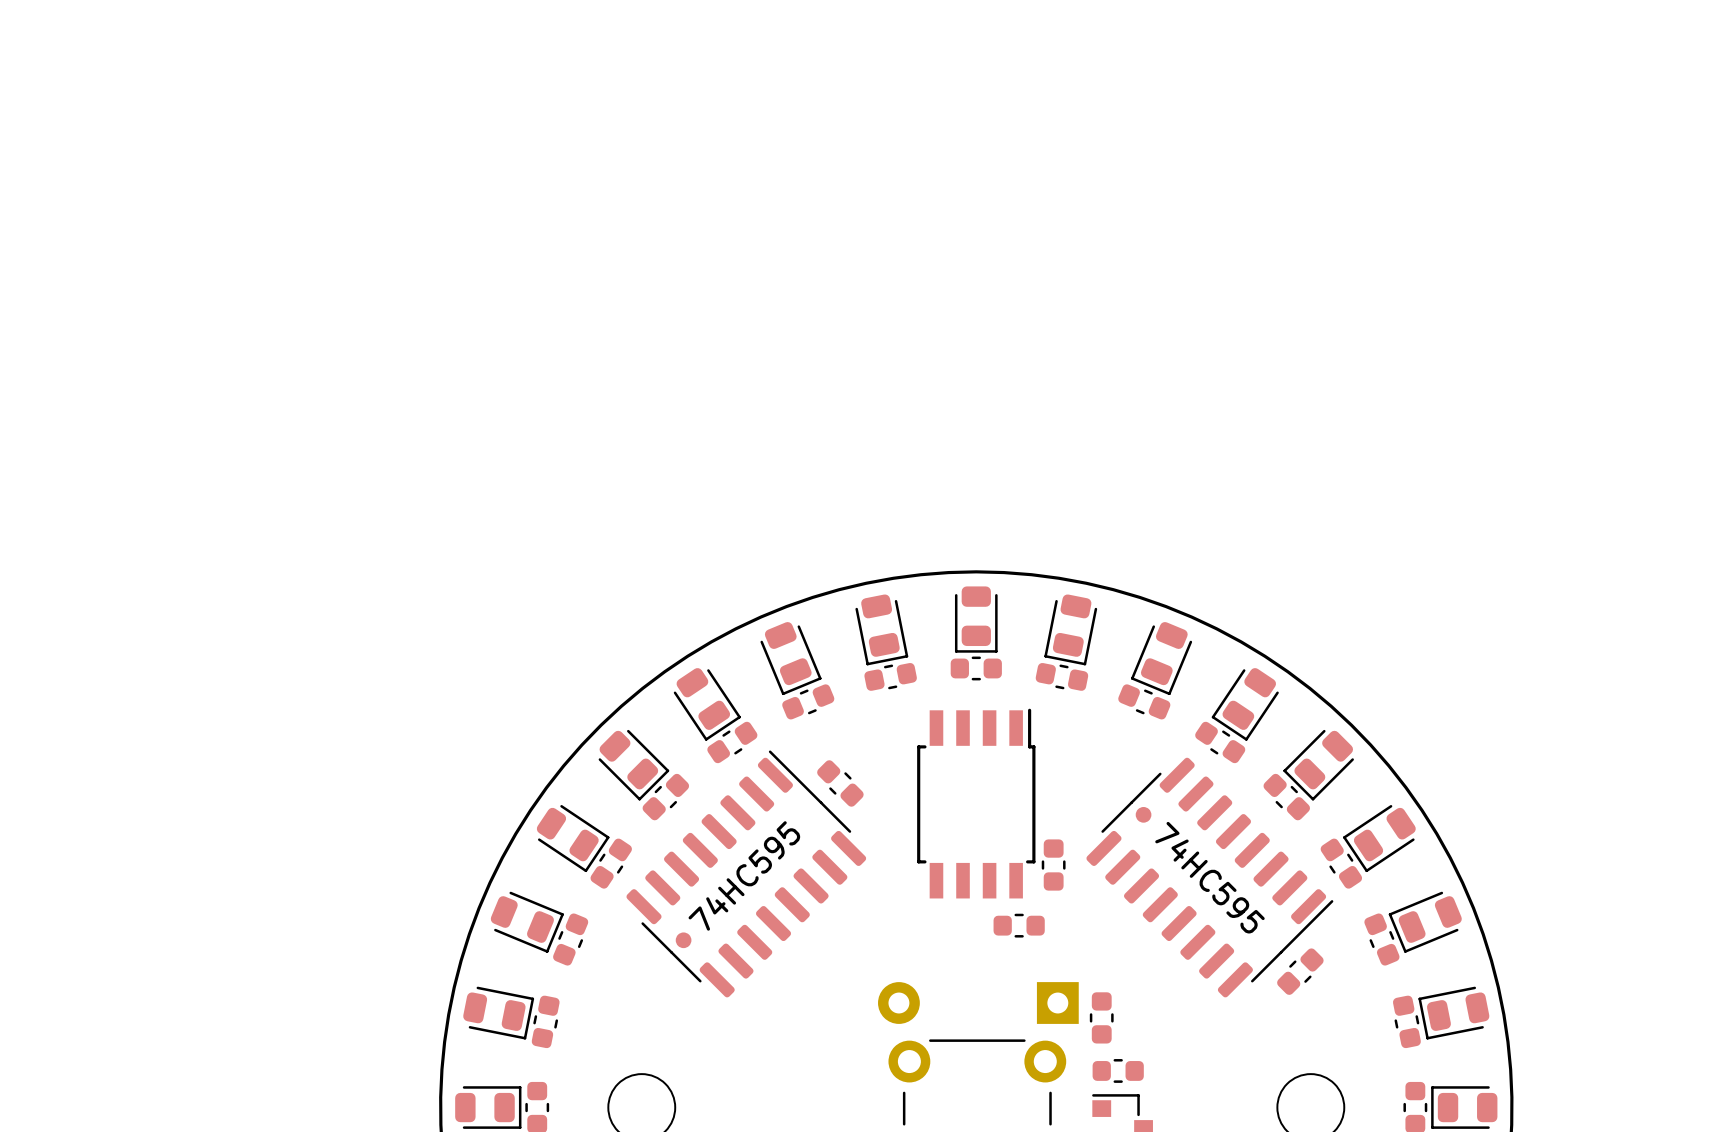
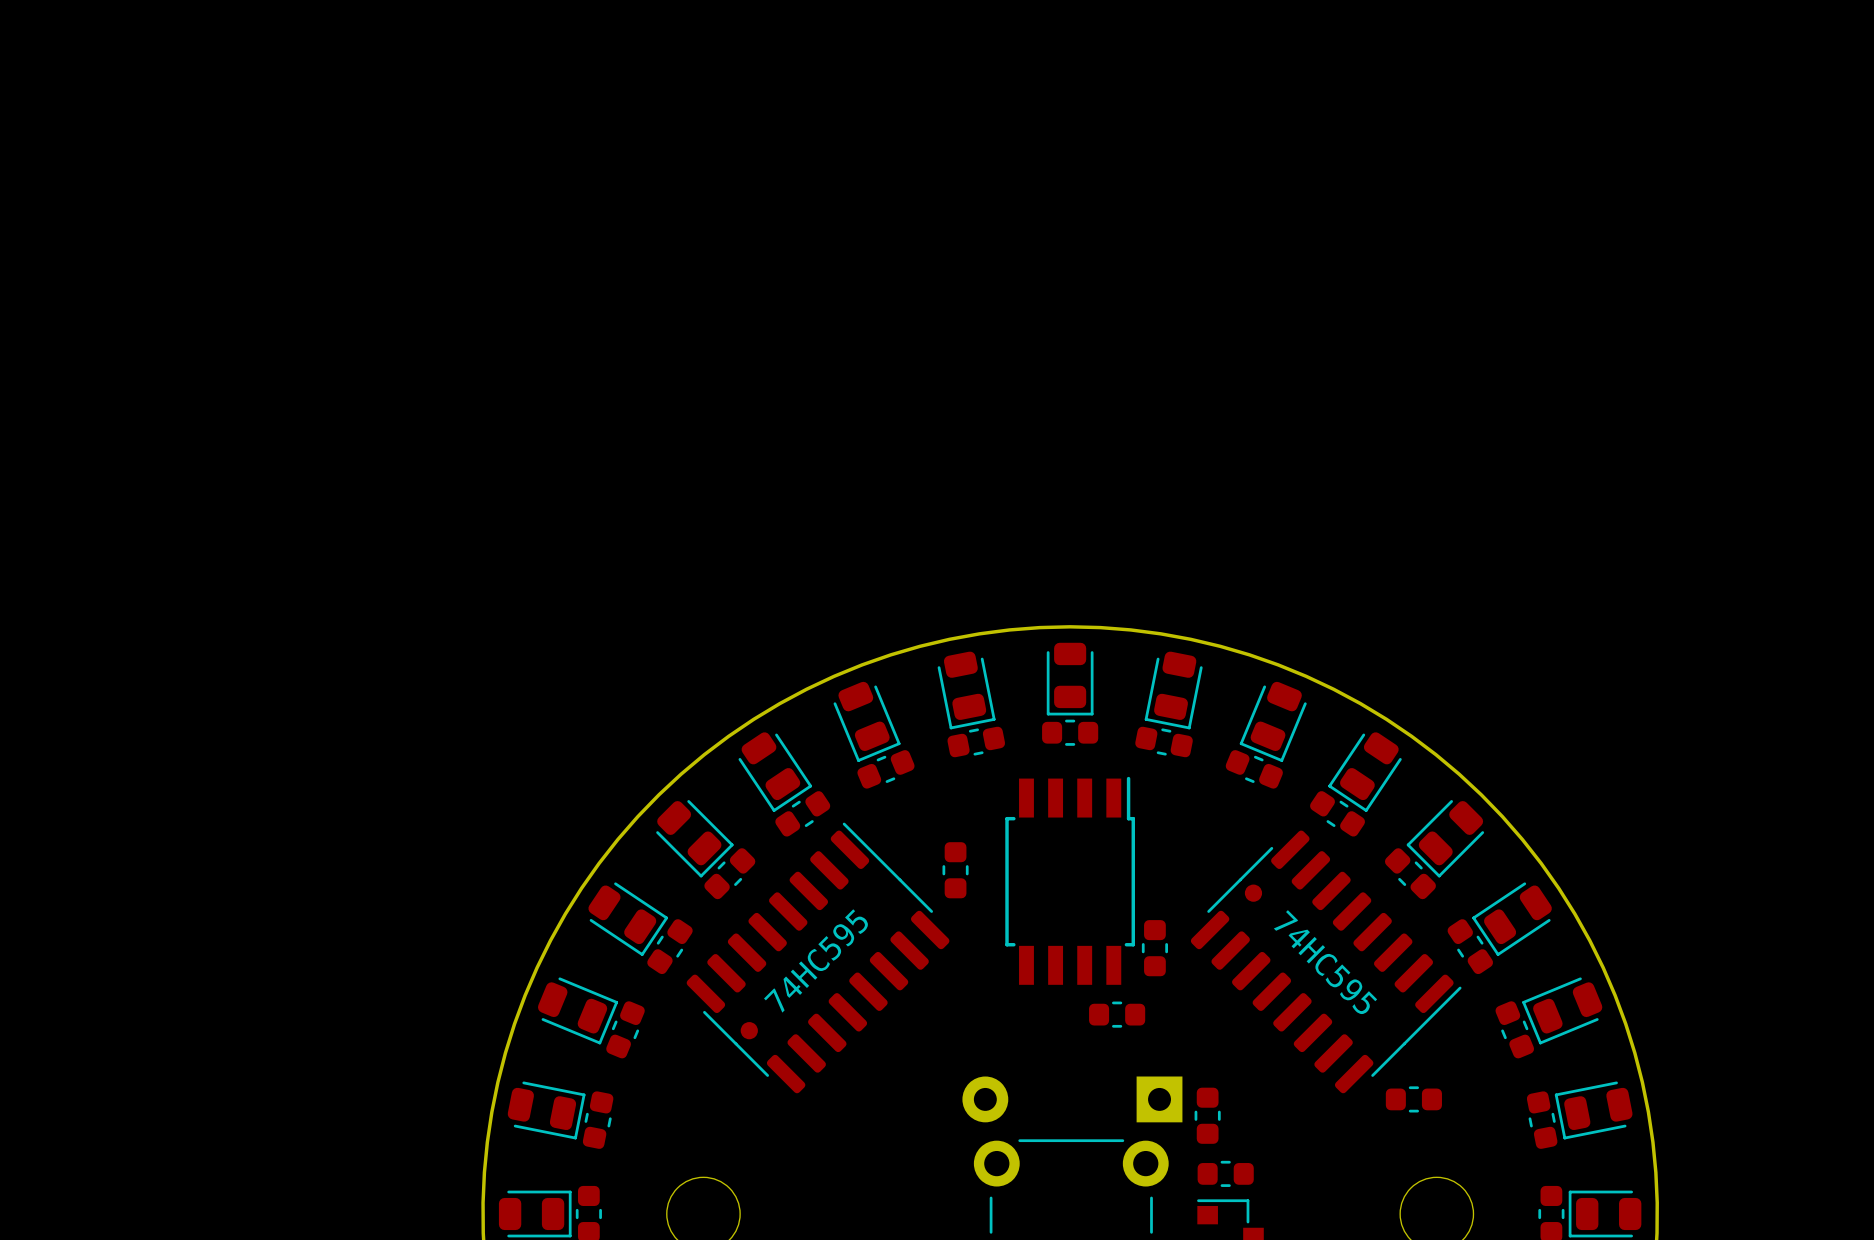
part: (840, 783) -> none
part: none -> (955, 870)
part: (1300, 971) -> none
part: none -> (1413, 1099)

